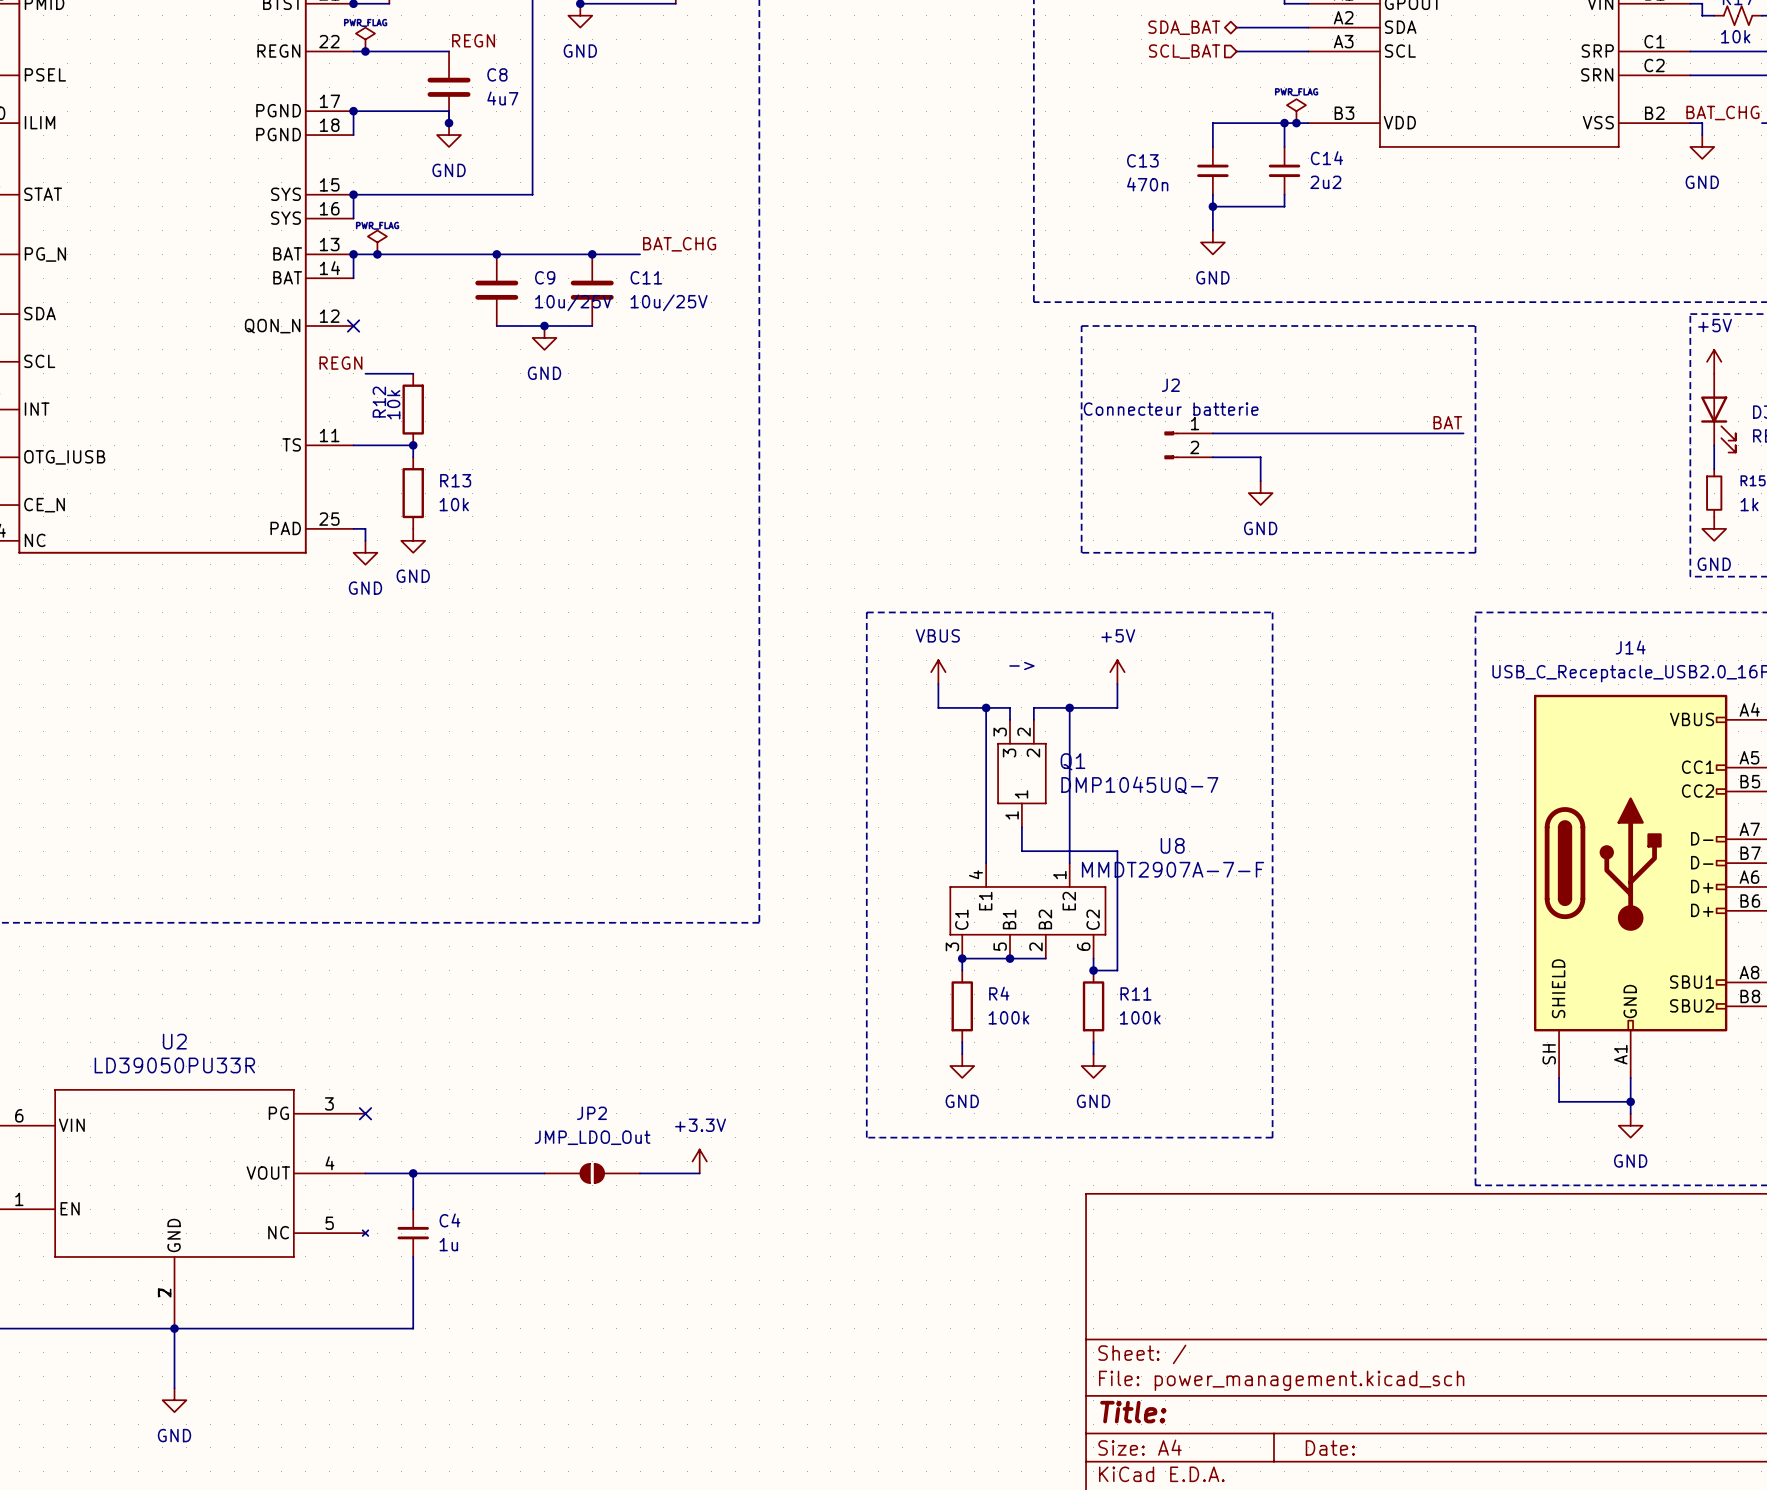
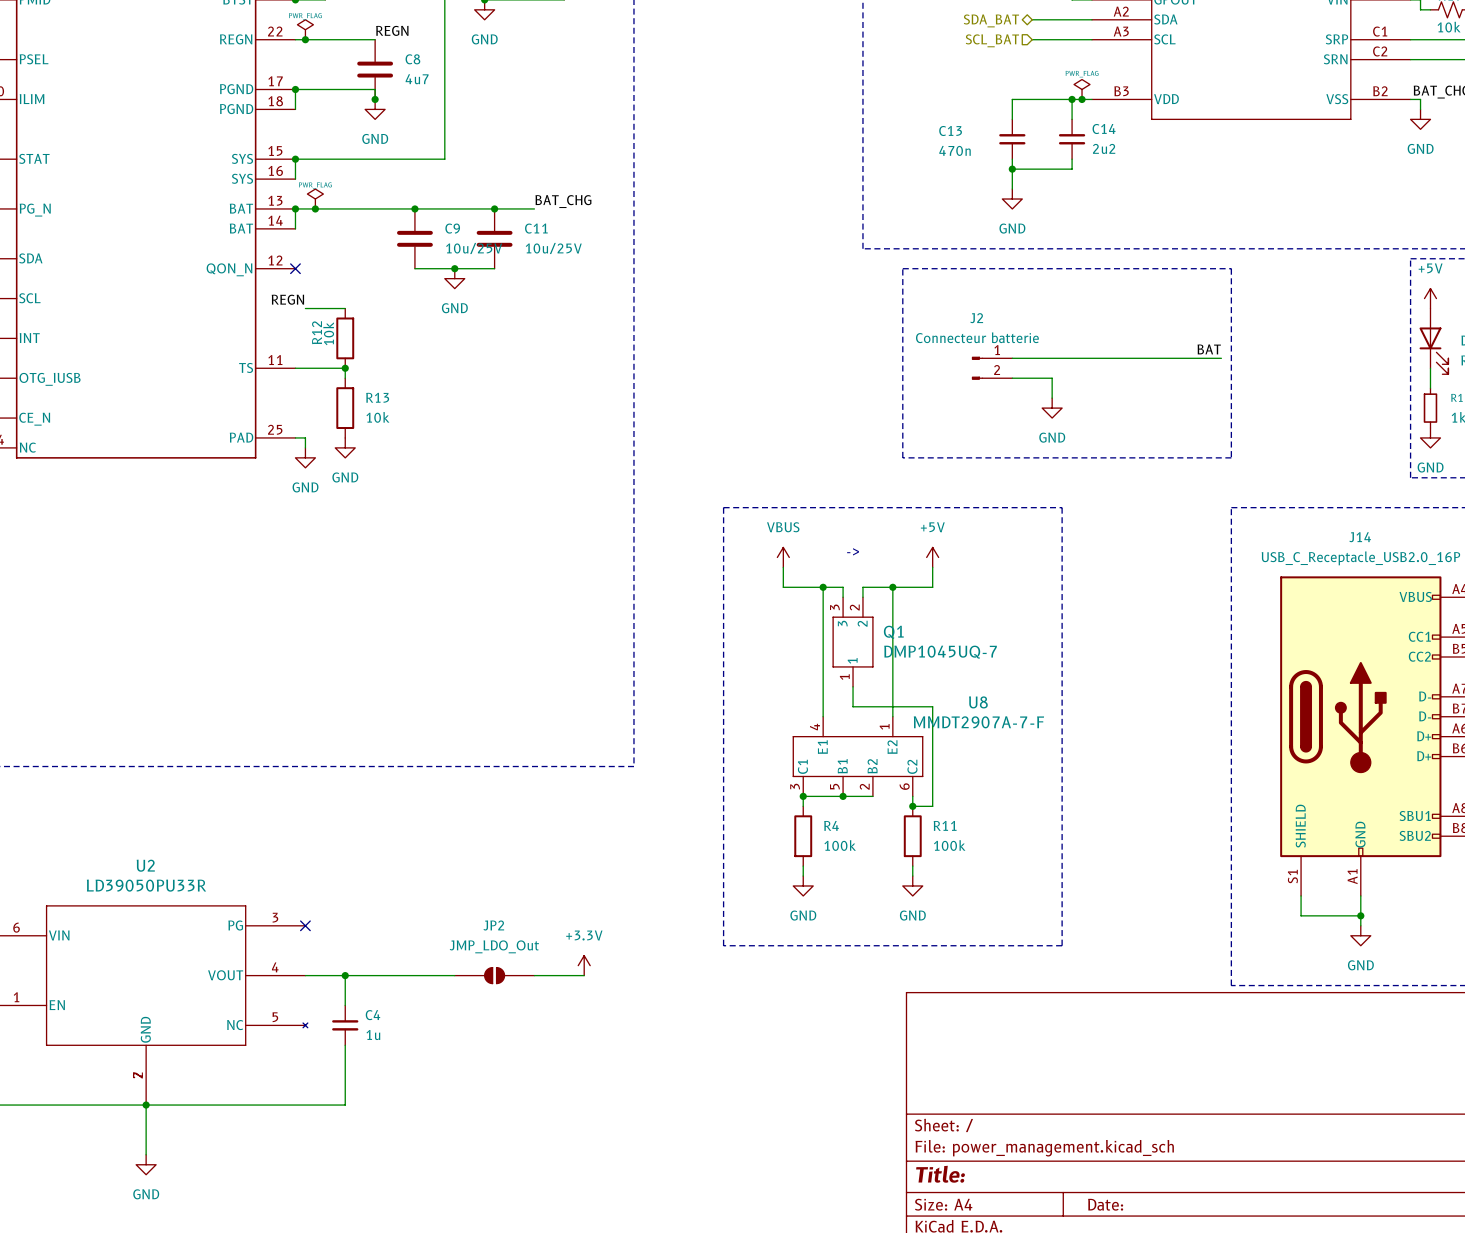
J14 pin number: SH (1549, 1054) -> S1 (1292, 876)

